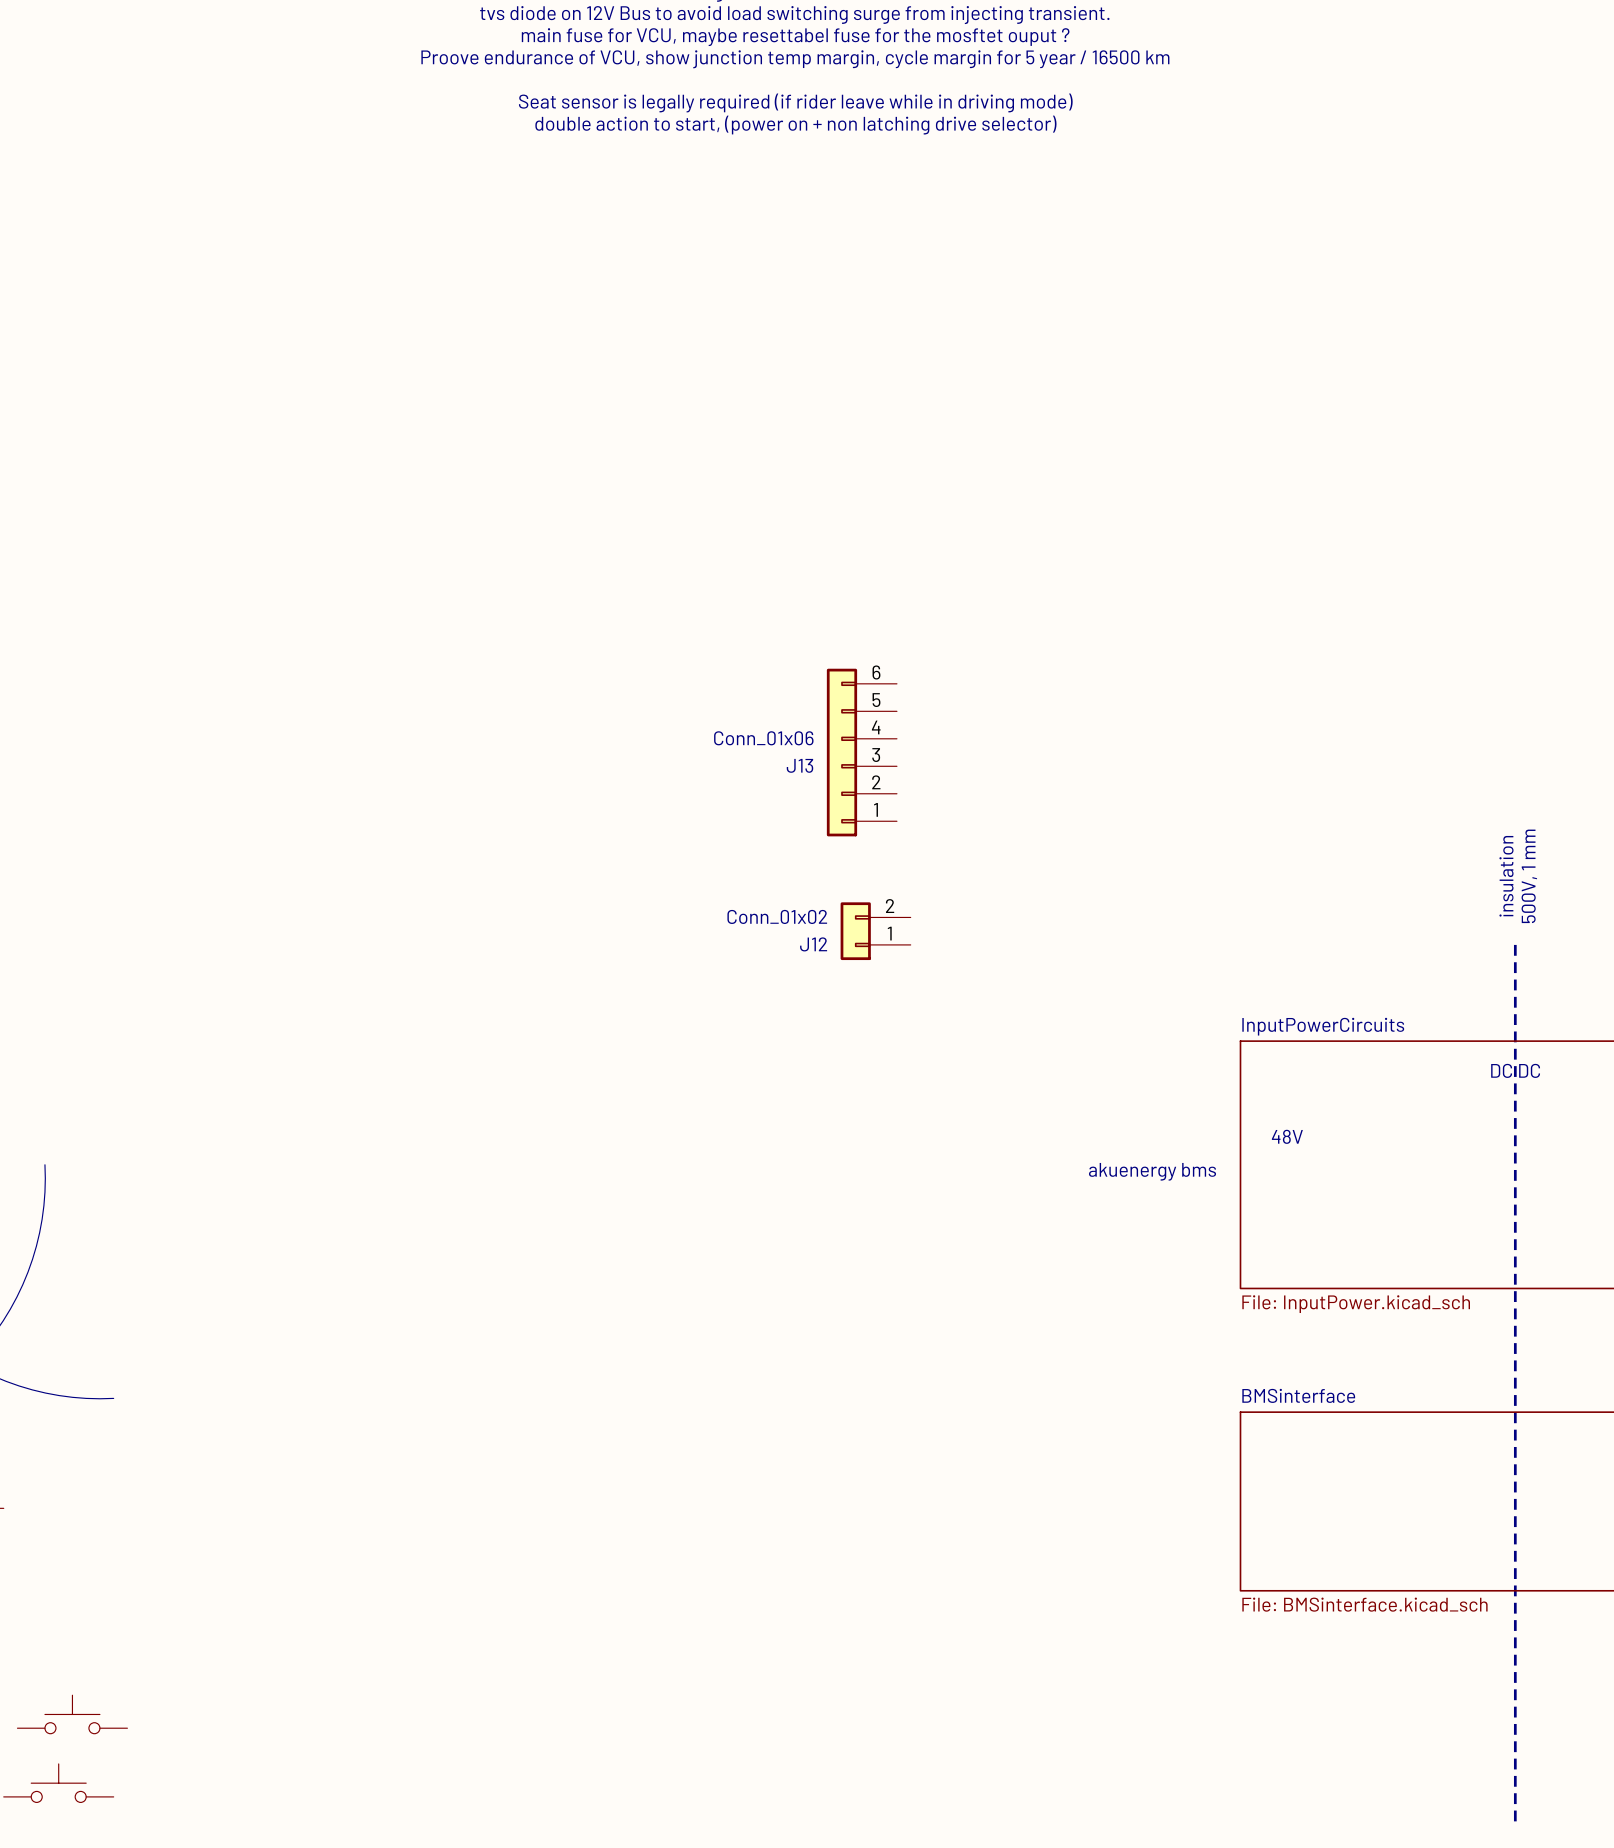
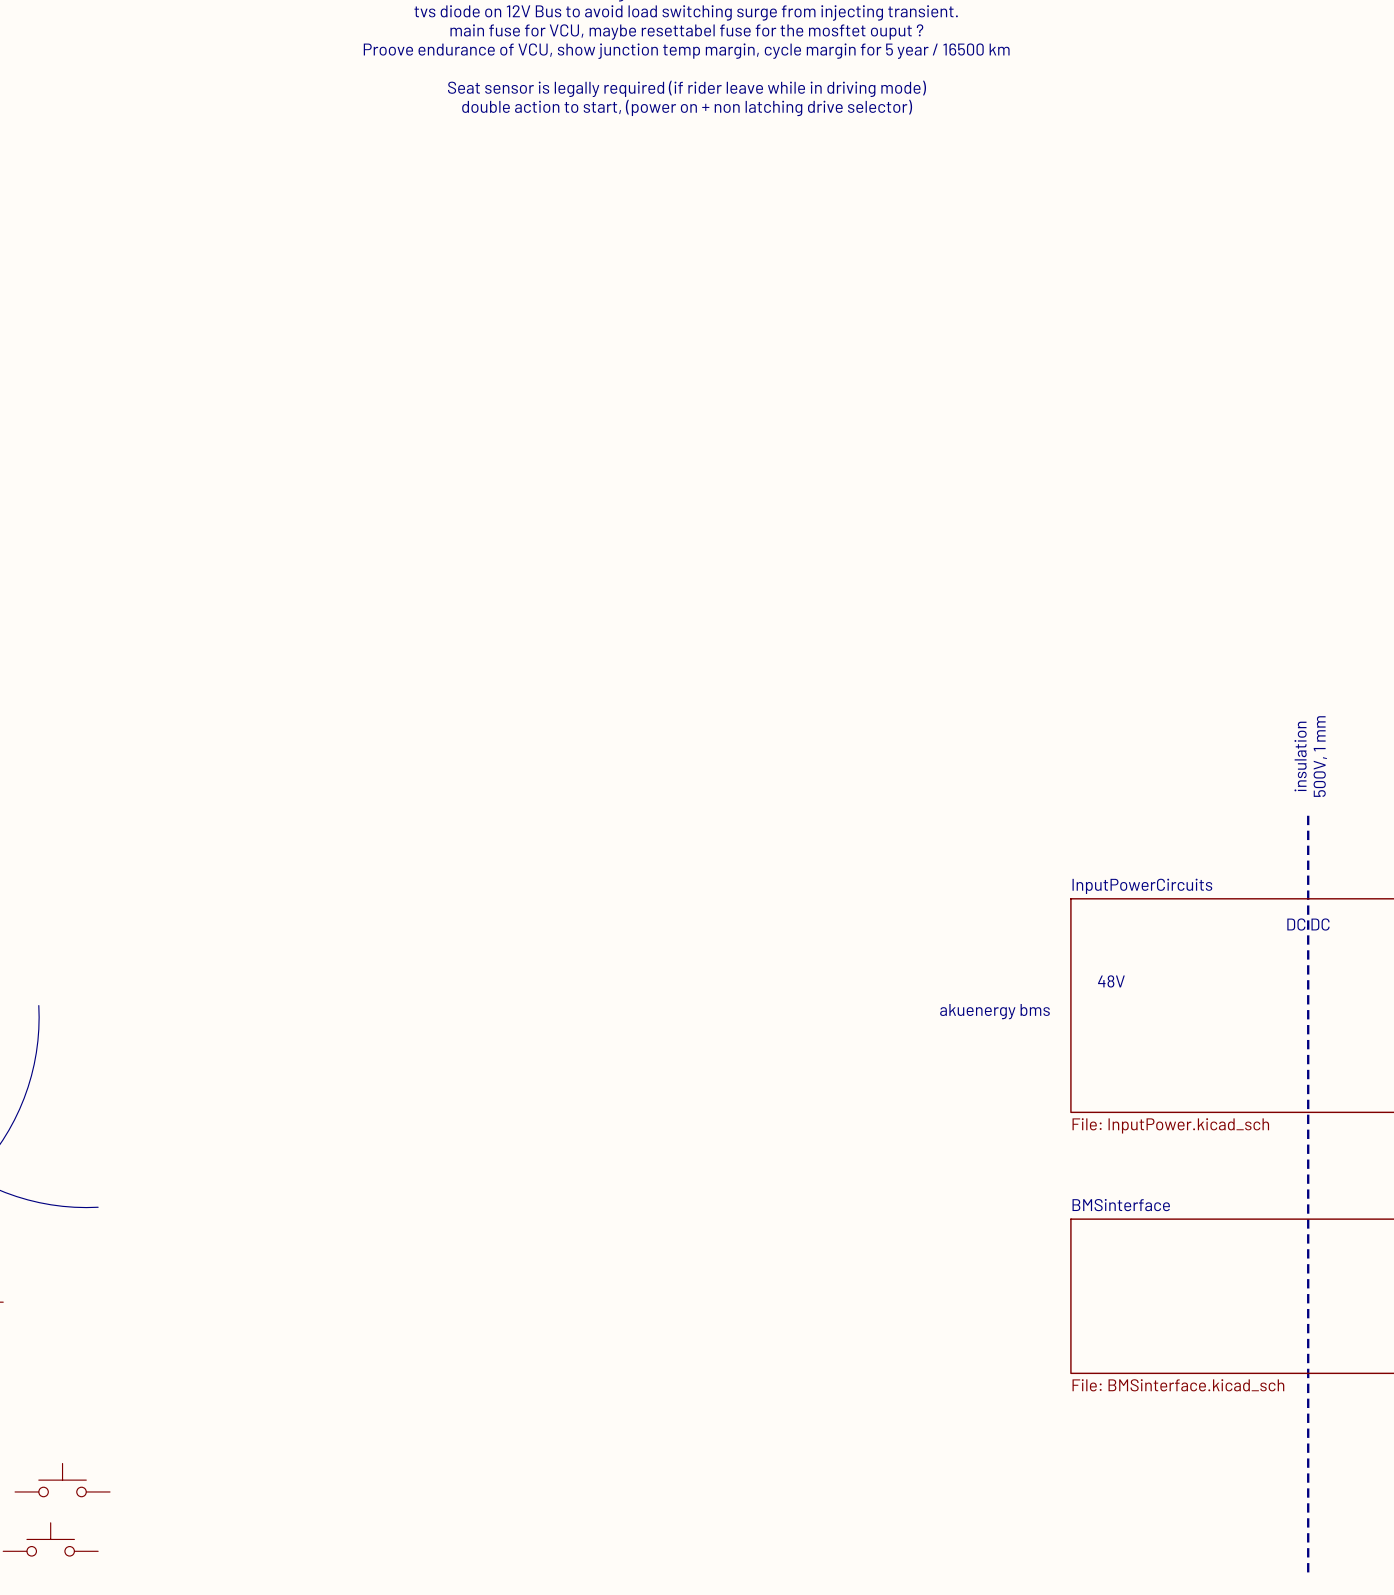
J13: Conn_01x06 (861, 752) -> none
J12: Conn_01x02 (875, 931) -> none

